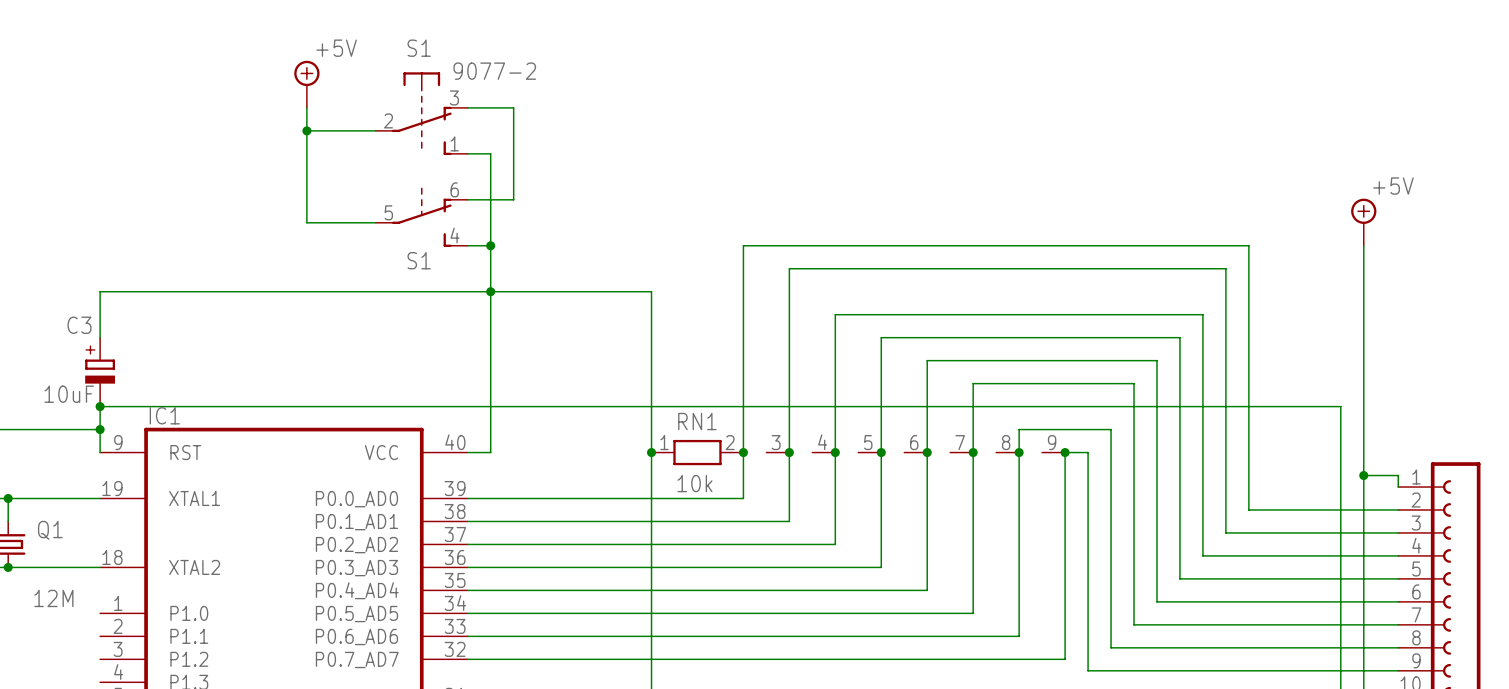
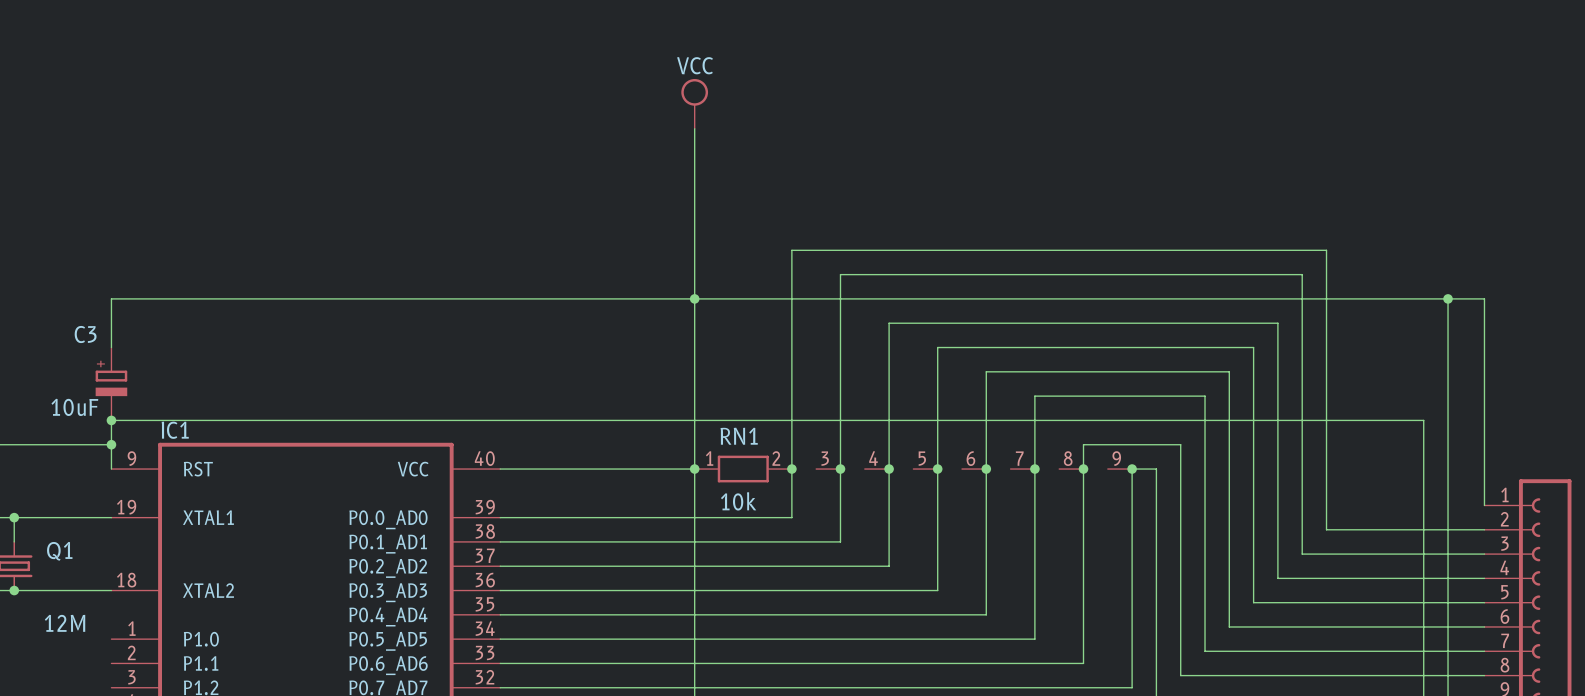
power symbol: +5V (306, 84) -> none
wire: (306, 107) (306, 222) (375, 222) -> none
wire: (467, 107) (513, 107) (513, 199) (467, 199) -> none
power symbol: none -> VCC (694, 103)
S1: 9077-2 (421, 113) -> none
wire: (306, 130) (375, 130) -> none
junction: (306, 130) -> none
wire: (467, 153) (490, 153) (490, 452) -> (694, 469) (524, 469)
S1: (421, 217) -> none
power symbol: +5V (1363, 222) -> none
wire: (467, 245) (490, 245) -> none
junction: (490, 245) -> none
wire: (1363, 245) (1363, 291) -> none
junction: (490, 291) -> none
junction: none -> (694, 298)
junction: none -> (1448, 298)
wire: (1363, 475) (1398, 475) -> (694, 128) (694, 298) (1484, 298) (1484, 493)
junction: (1363, 475) -> none

